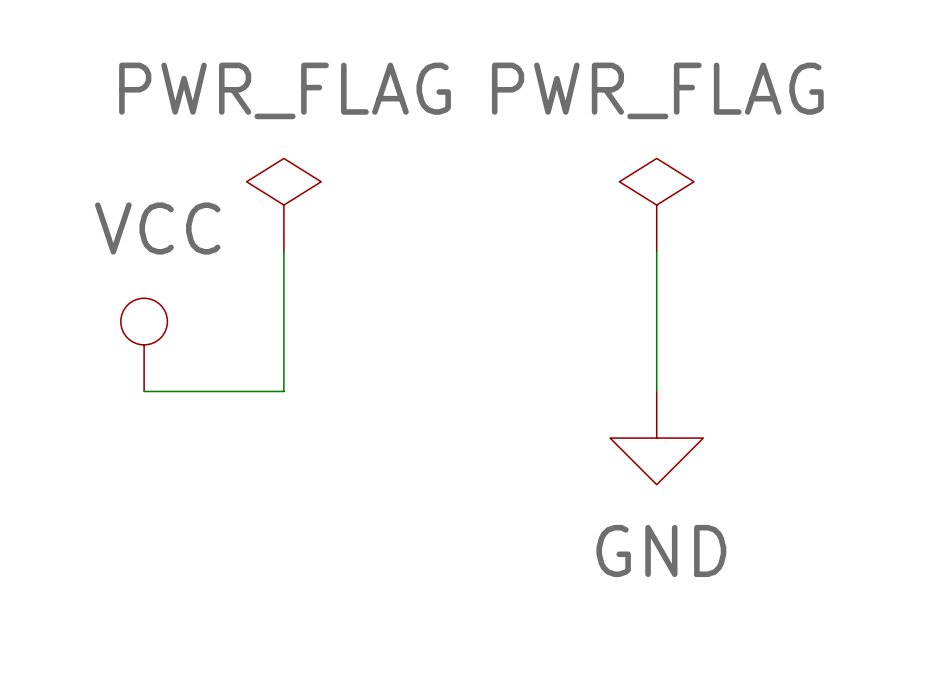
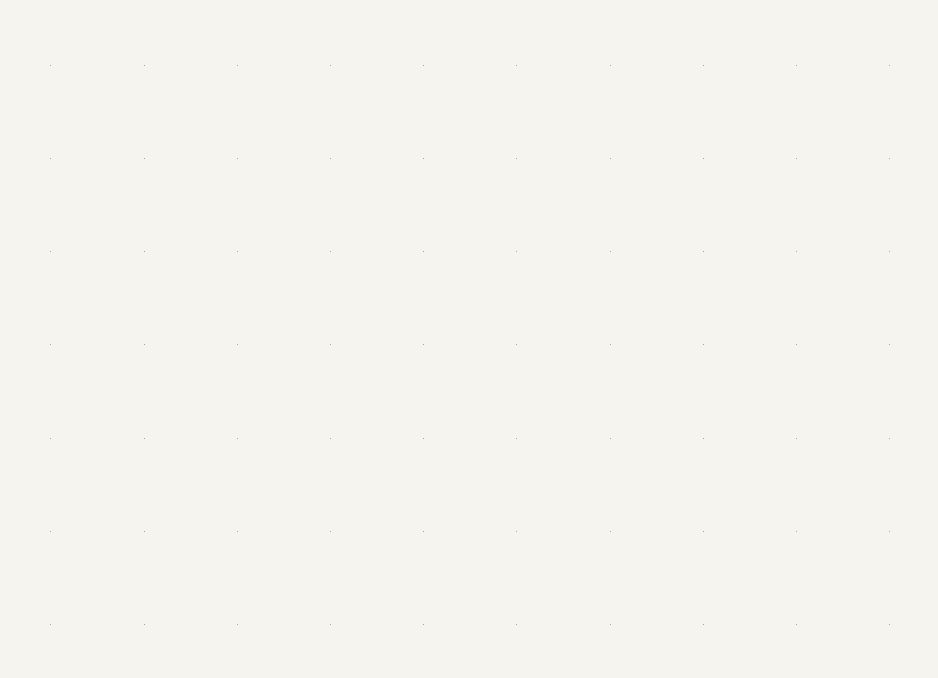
power symbol: PWR_FLAG (283, 205) -> none
power symbol: PWR_FLAG (656, 205) -> none
wire: (283, 251) (283, 391) (144, 391) -> none
wire: (656, 251) (656, 391) -> none
power symbol: VCC (144, 344) -> none
power symbol: GND (656, 438) -> none

